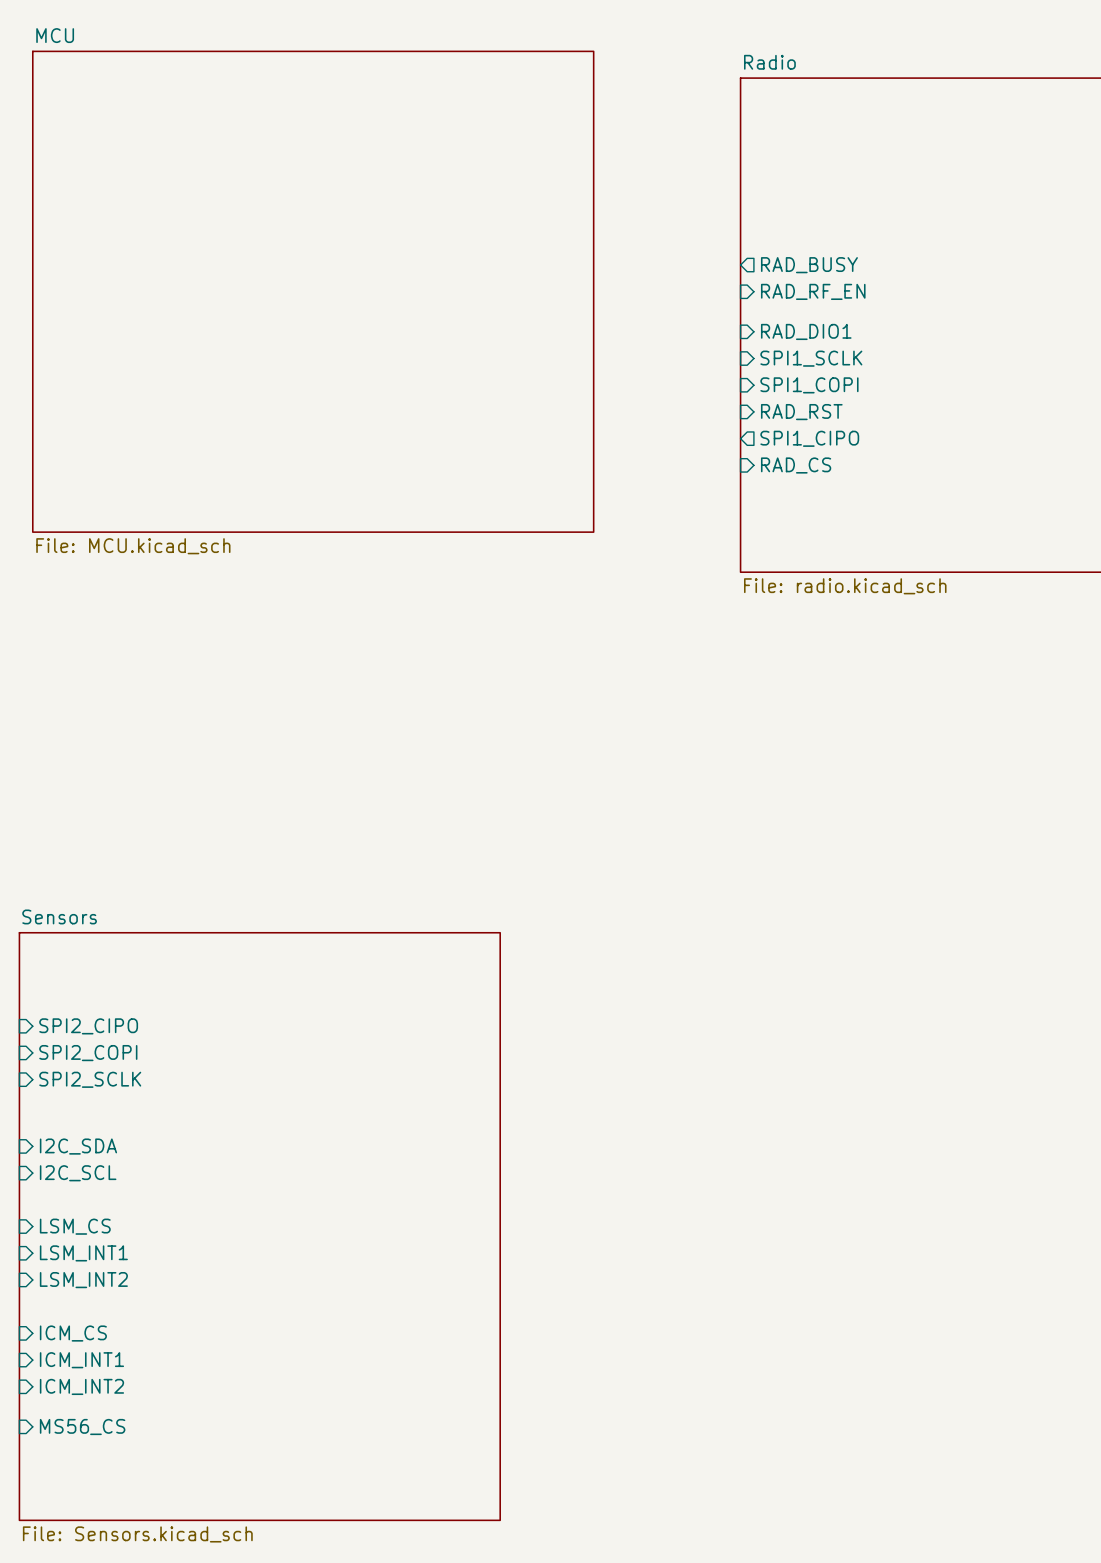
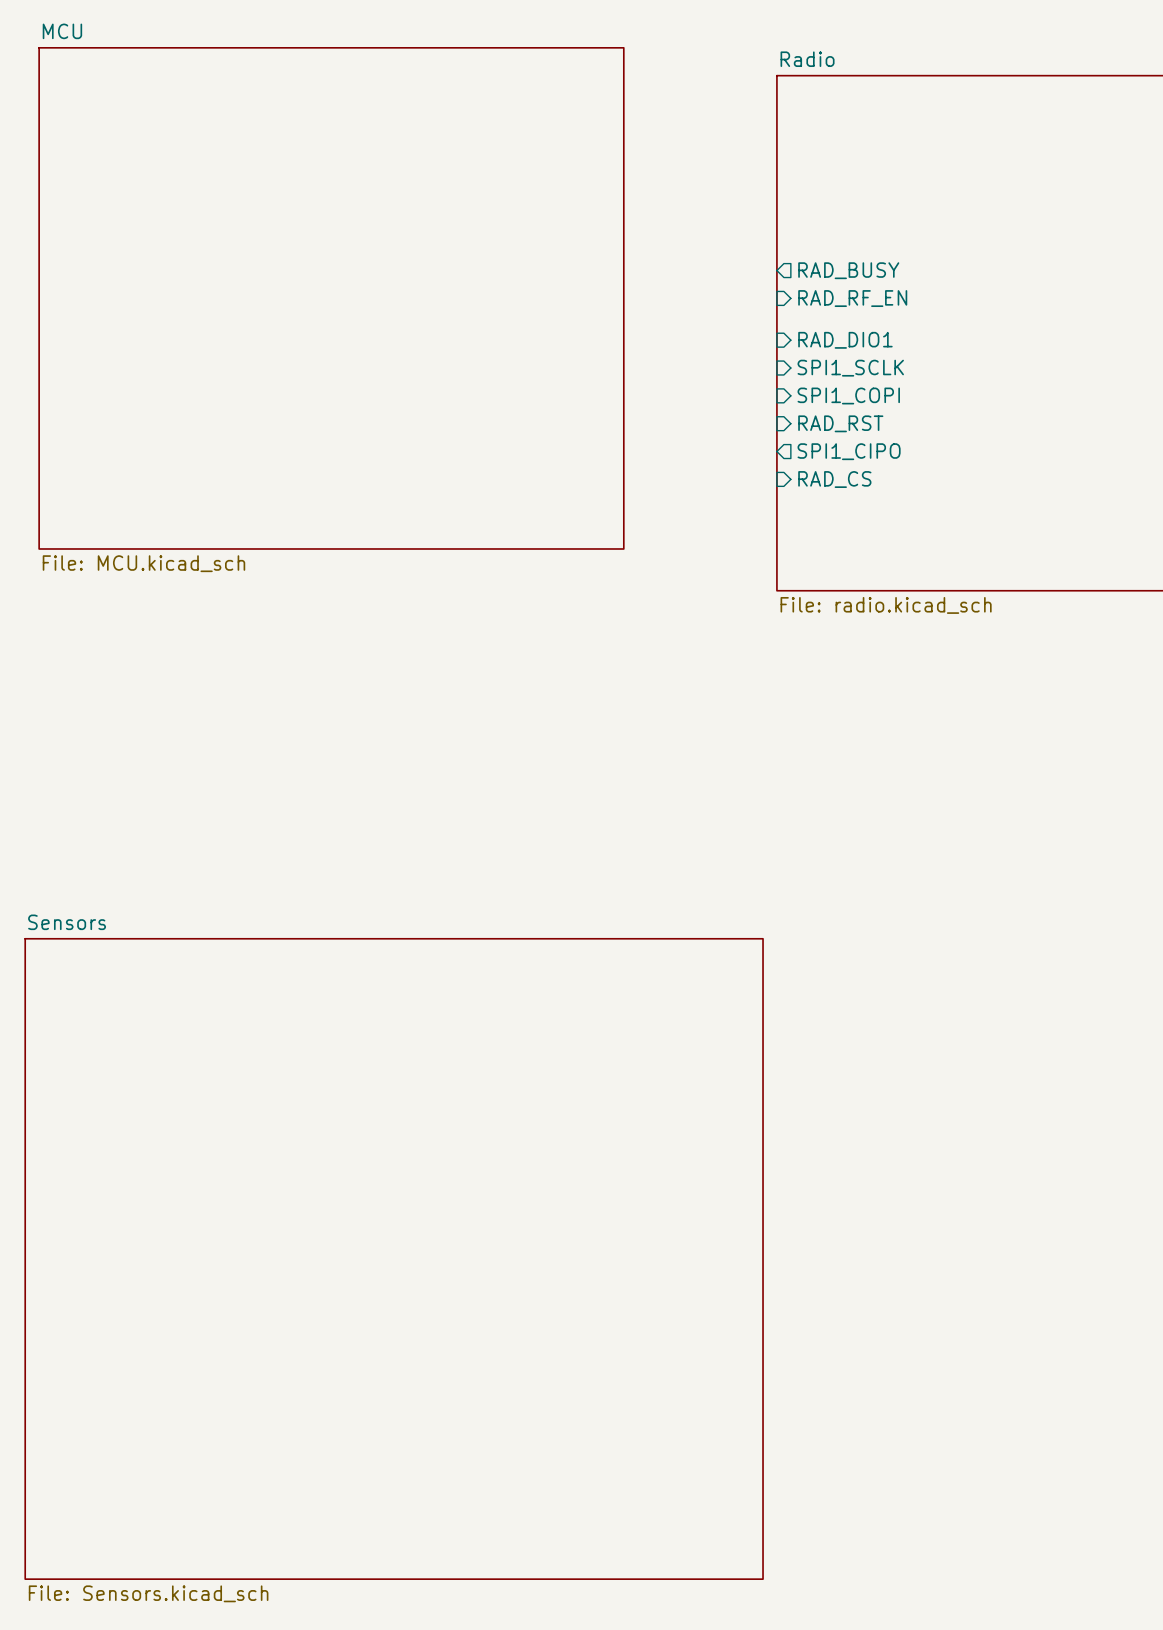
sheet pin: SPI2_CIPO (88, 1026) -> none
sheet pin: SPI2_COPI (88, 1053) -> none
sheet pin: SPI2_SCLK (90, 1079) -> none
sheet pin: I2C_SDA (78, 1146) -> none
sheet pin: I2C_SCL (78, 1173) -> none
sheet Sensors: none -> File: Sensors.kicad_sch (394, 1258)
sheet pin: LSM_CS (75, 1226) -> none
sheet Sensors: File: Sensors.kicad_sch (259, 1226) -> none
sheet pin: LSM_INT1 (83, 1253) -> none
sheet pin: LSM_INT2 (83, 1280) -> none
sheet pin: ICM_CS (73, 1333) -> none
sheet pin: ICM_INT1 (81, 1360) -> none
sheet pin: ICM_INT2 (81, 1386) -> none
sheet pin: MS56_CS (82, 1427) -> none

